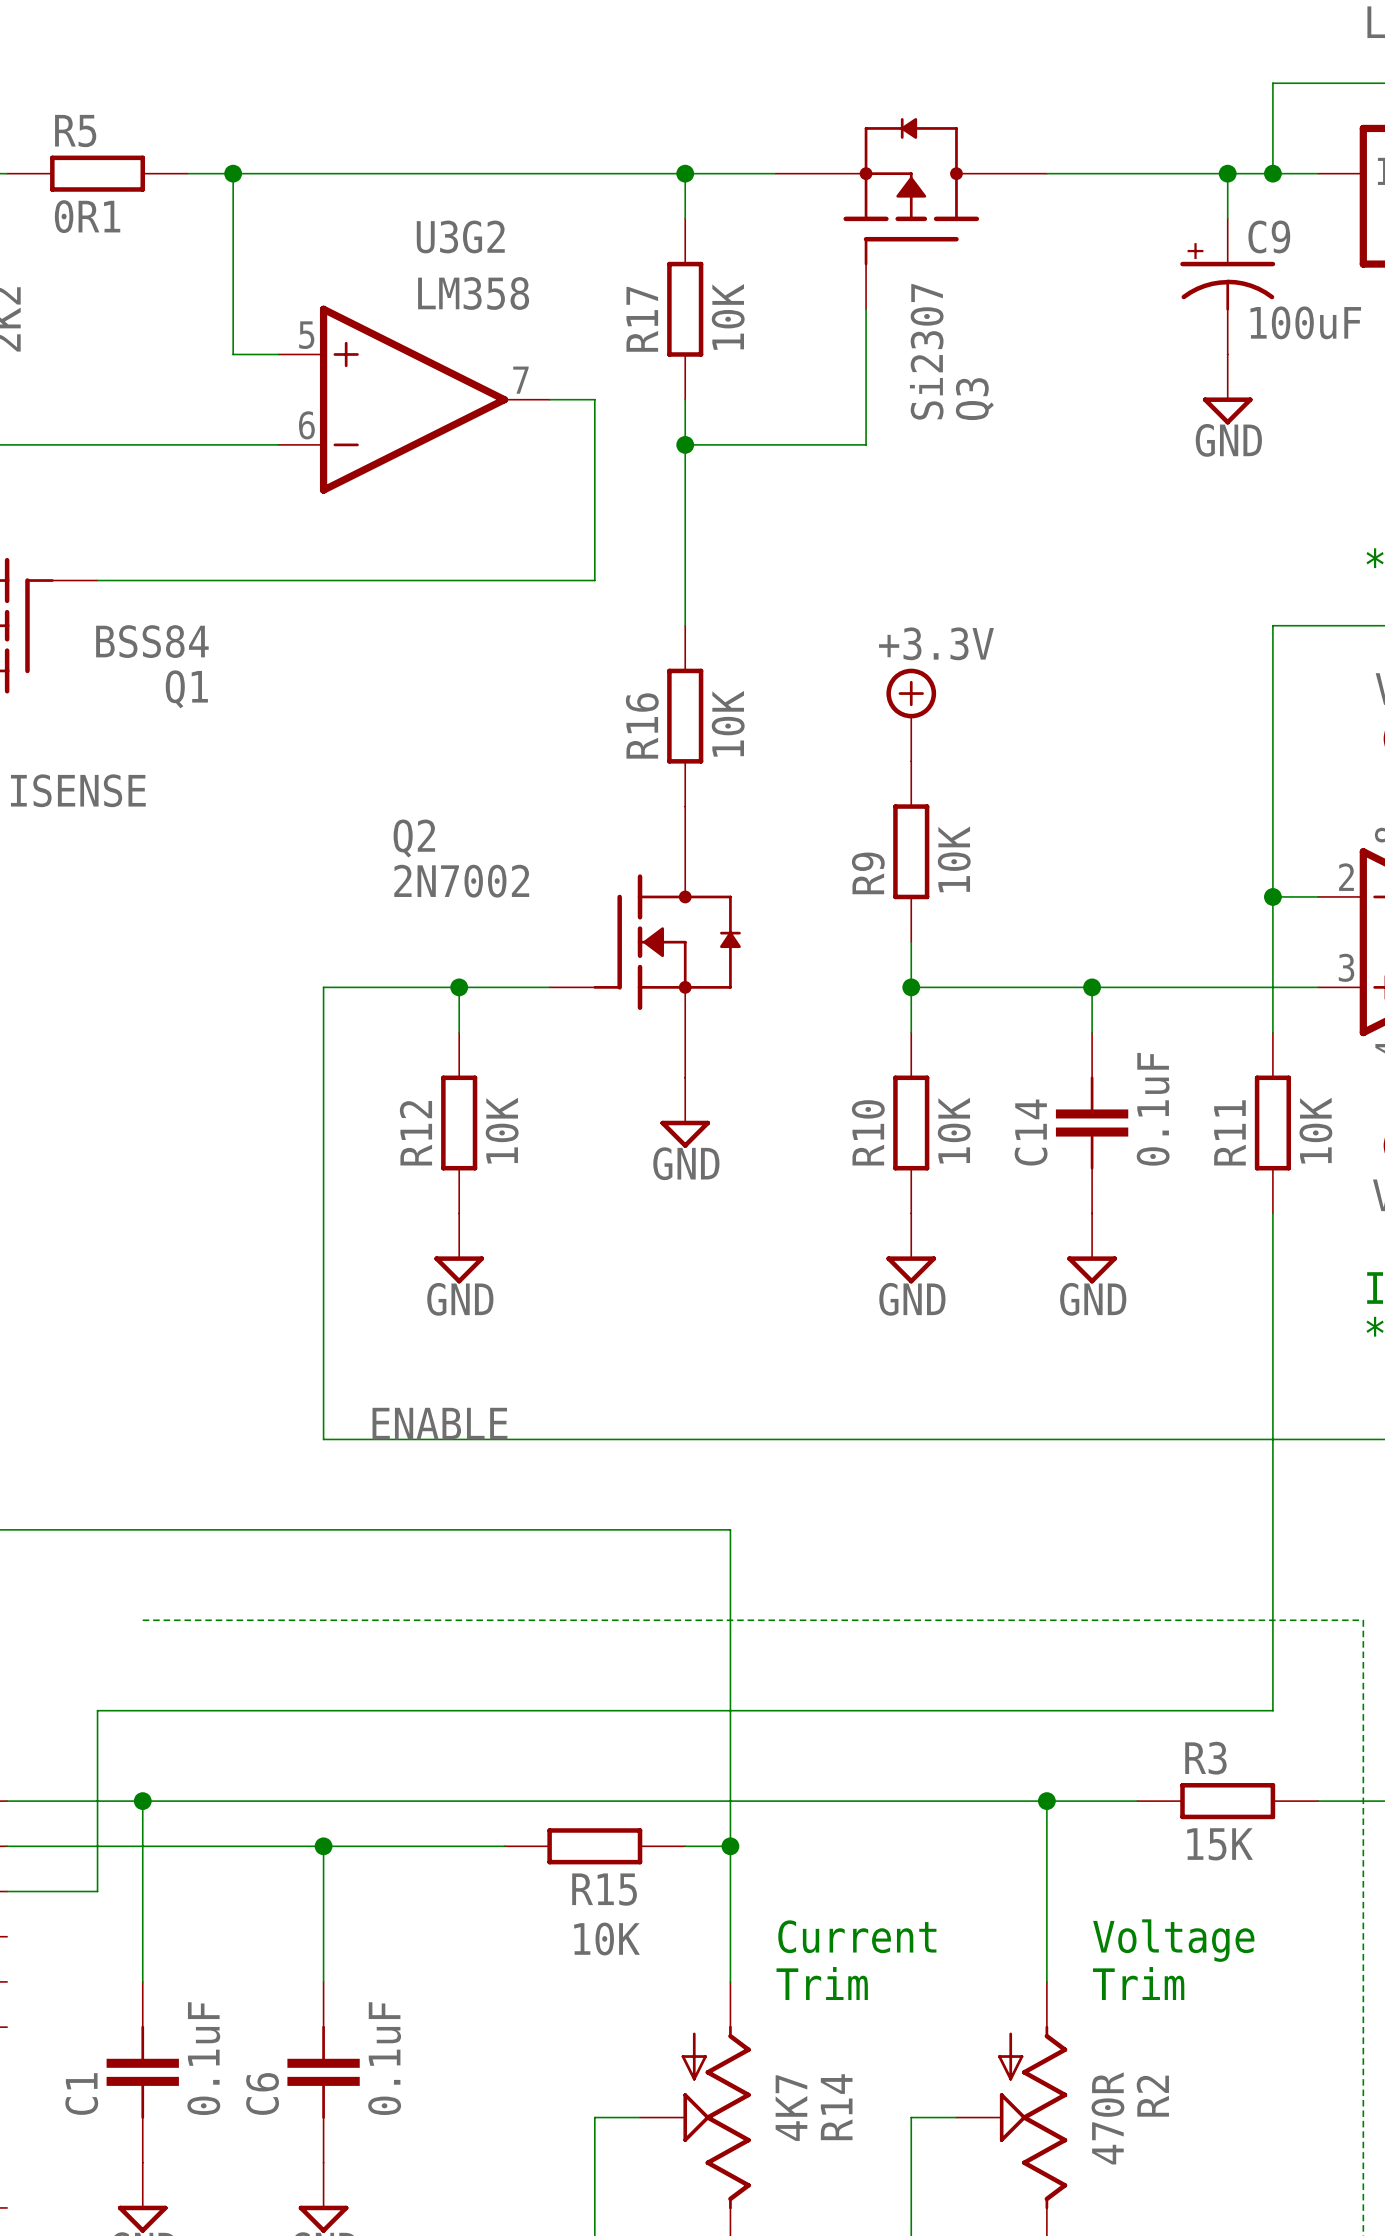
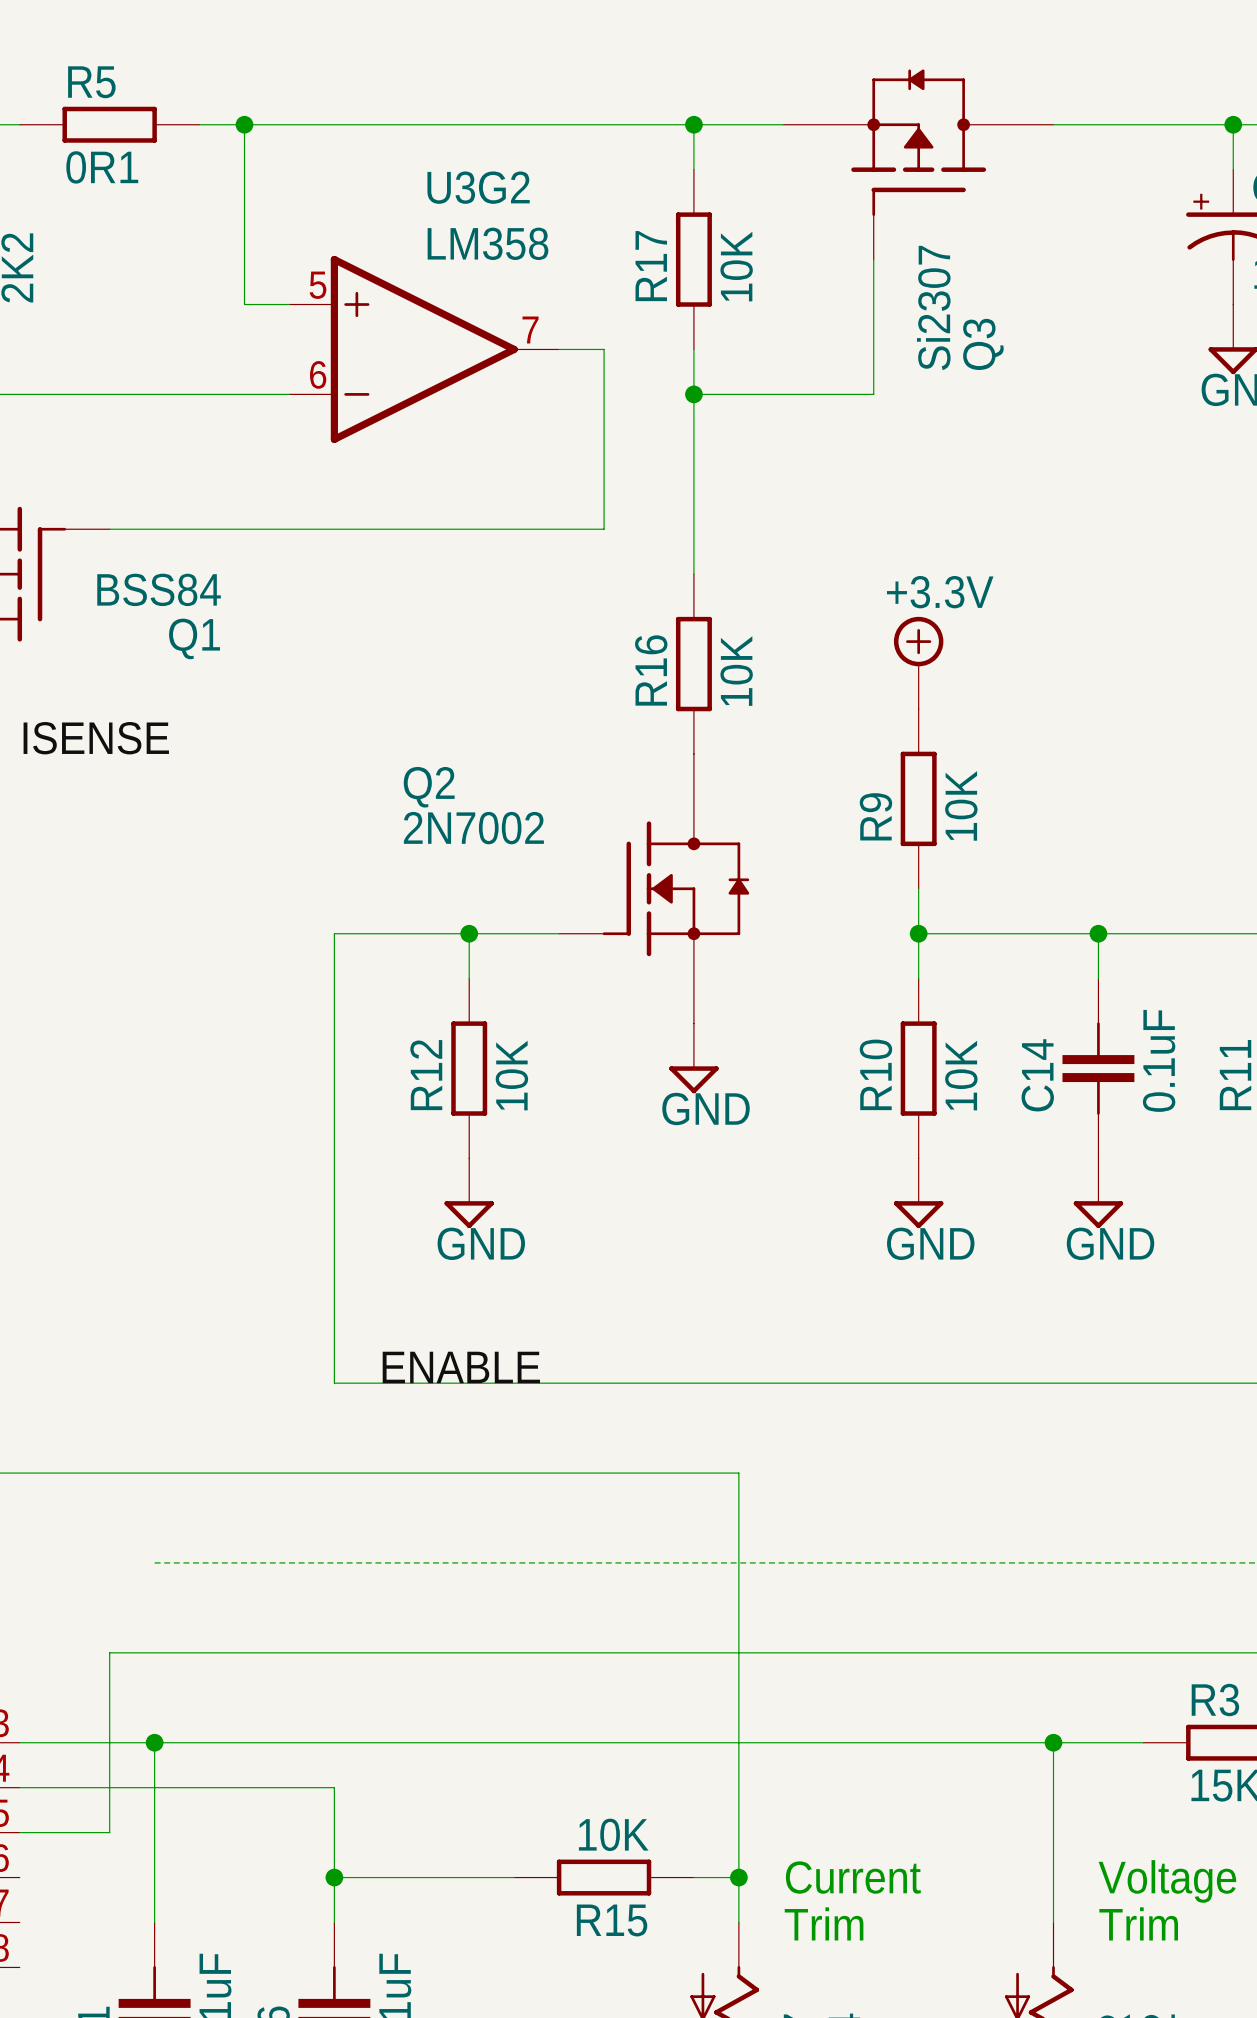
wire: (323, 1846) (504, 1846) -> (334, 1877) (514, 1877)
junction position: (323, 1846) -> (334, 1877)
R15 position: (594, 1846) -> (604, 1877)
wire: (685, 1846) (730, 1846) -> (693, 1877) (738, 1877)
junction position: (730, 1846) -> (738, 1877)
R15 value position: 10K (607, 1939) -> 10K (613, 1834)

